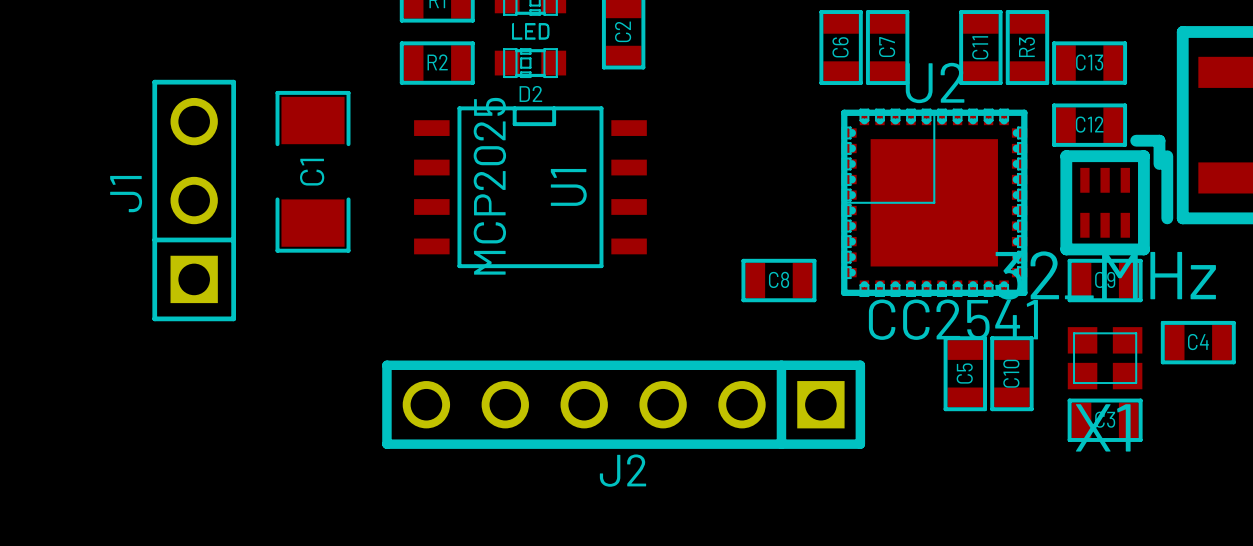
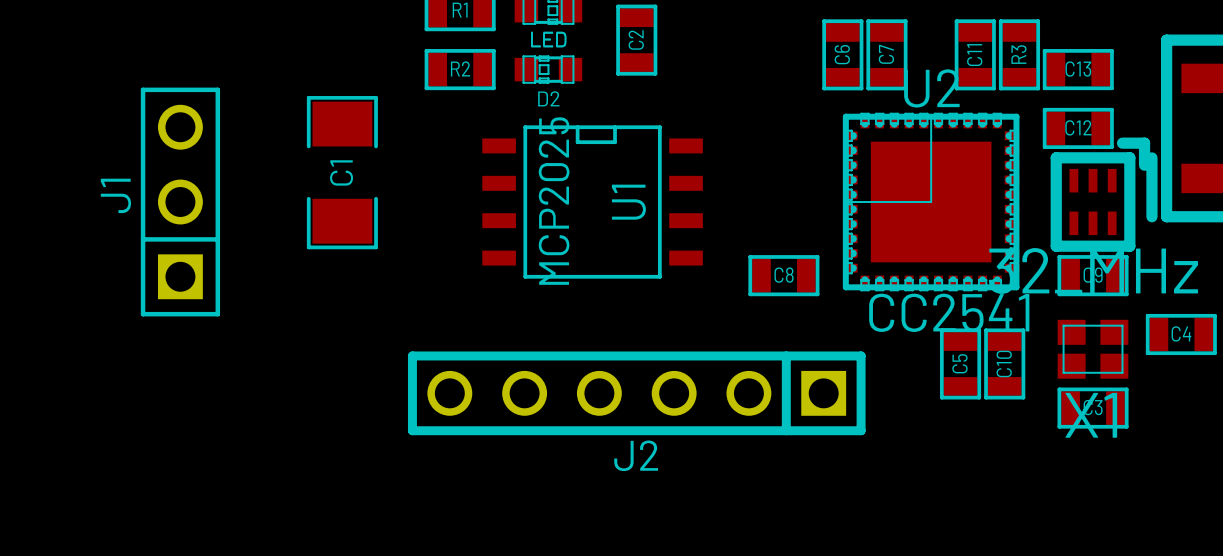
U1 position: (530, 187) -> (592, 202)
J1 position: (194, 200) -> (180, 202)

